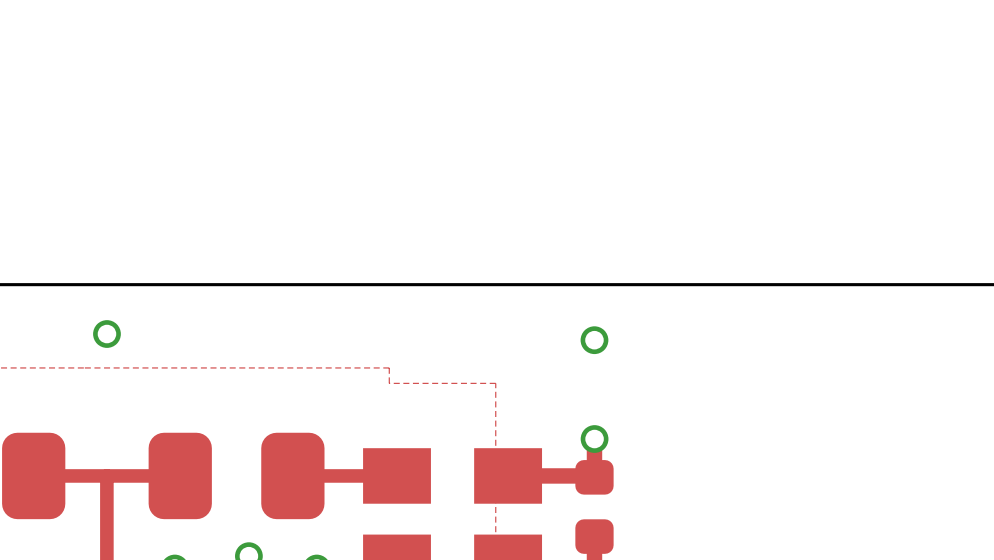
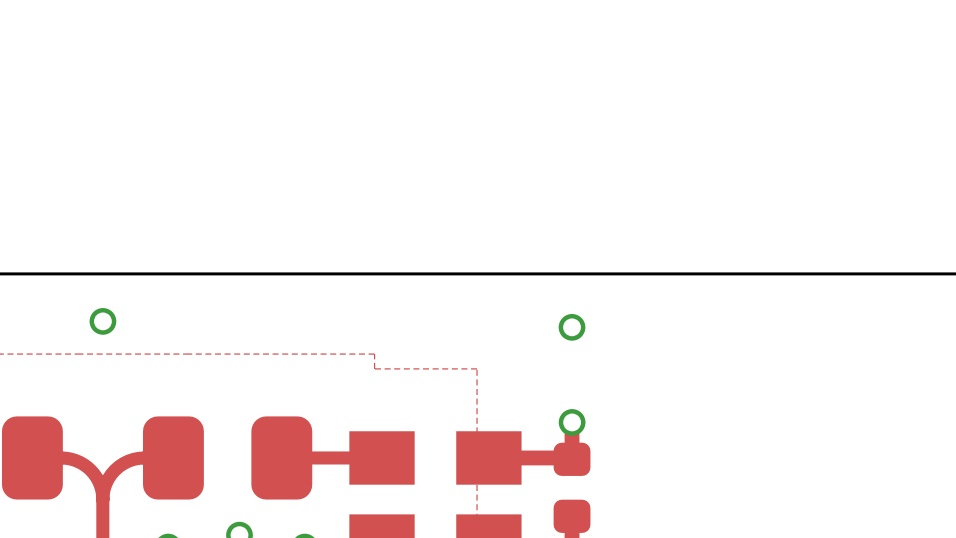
top track: (106, 475) (106, 519) -> none
top track: (150, 475) (63, 475) -> (144, 457) (128, 461) (115, 470) (106, 483) (102, 499) (98, 481) (90, 470) (75, 460) (61, 457)

